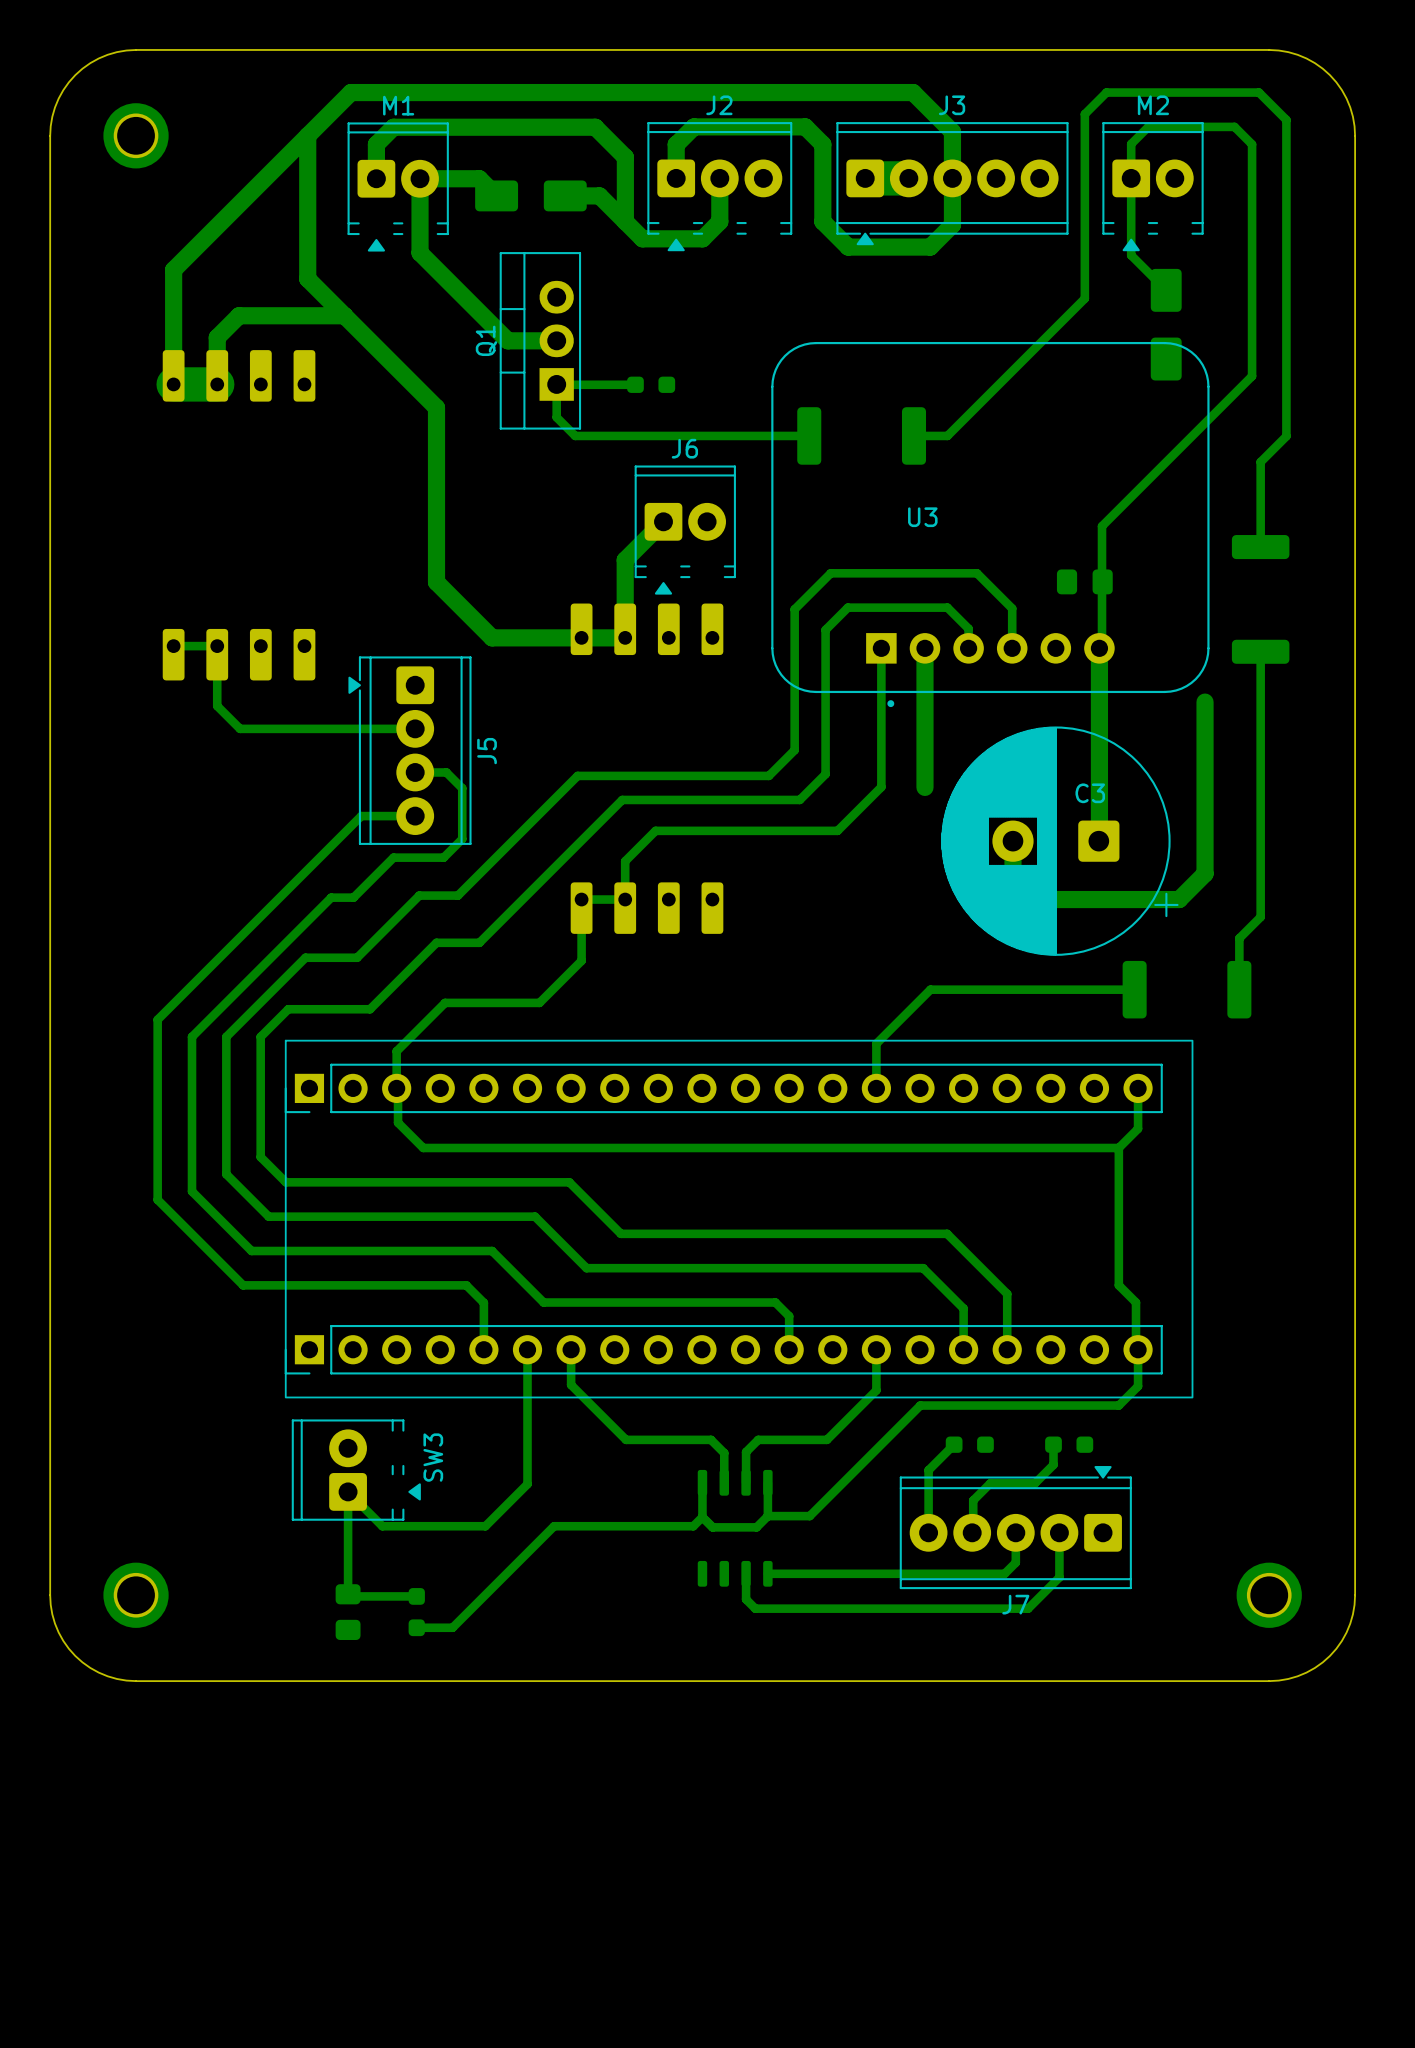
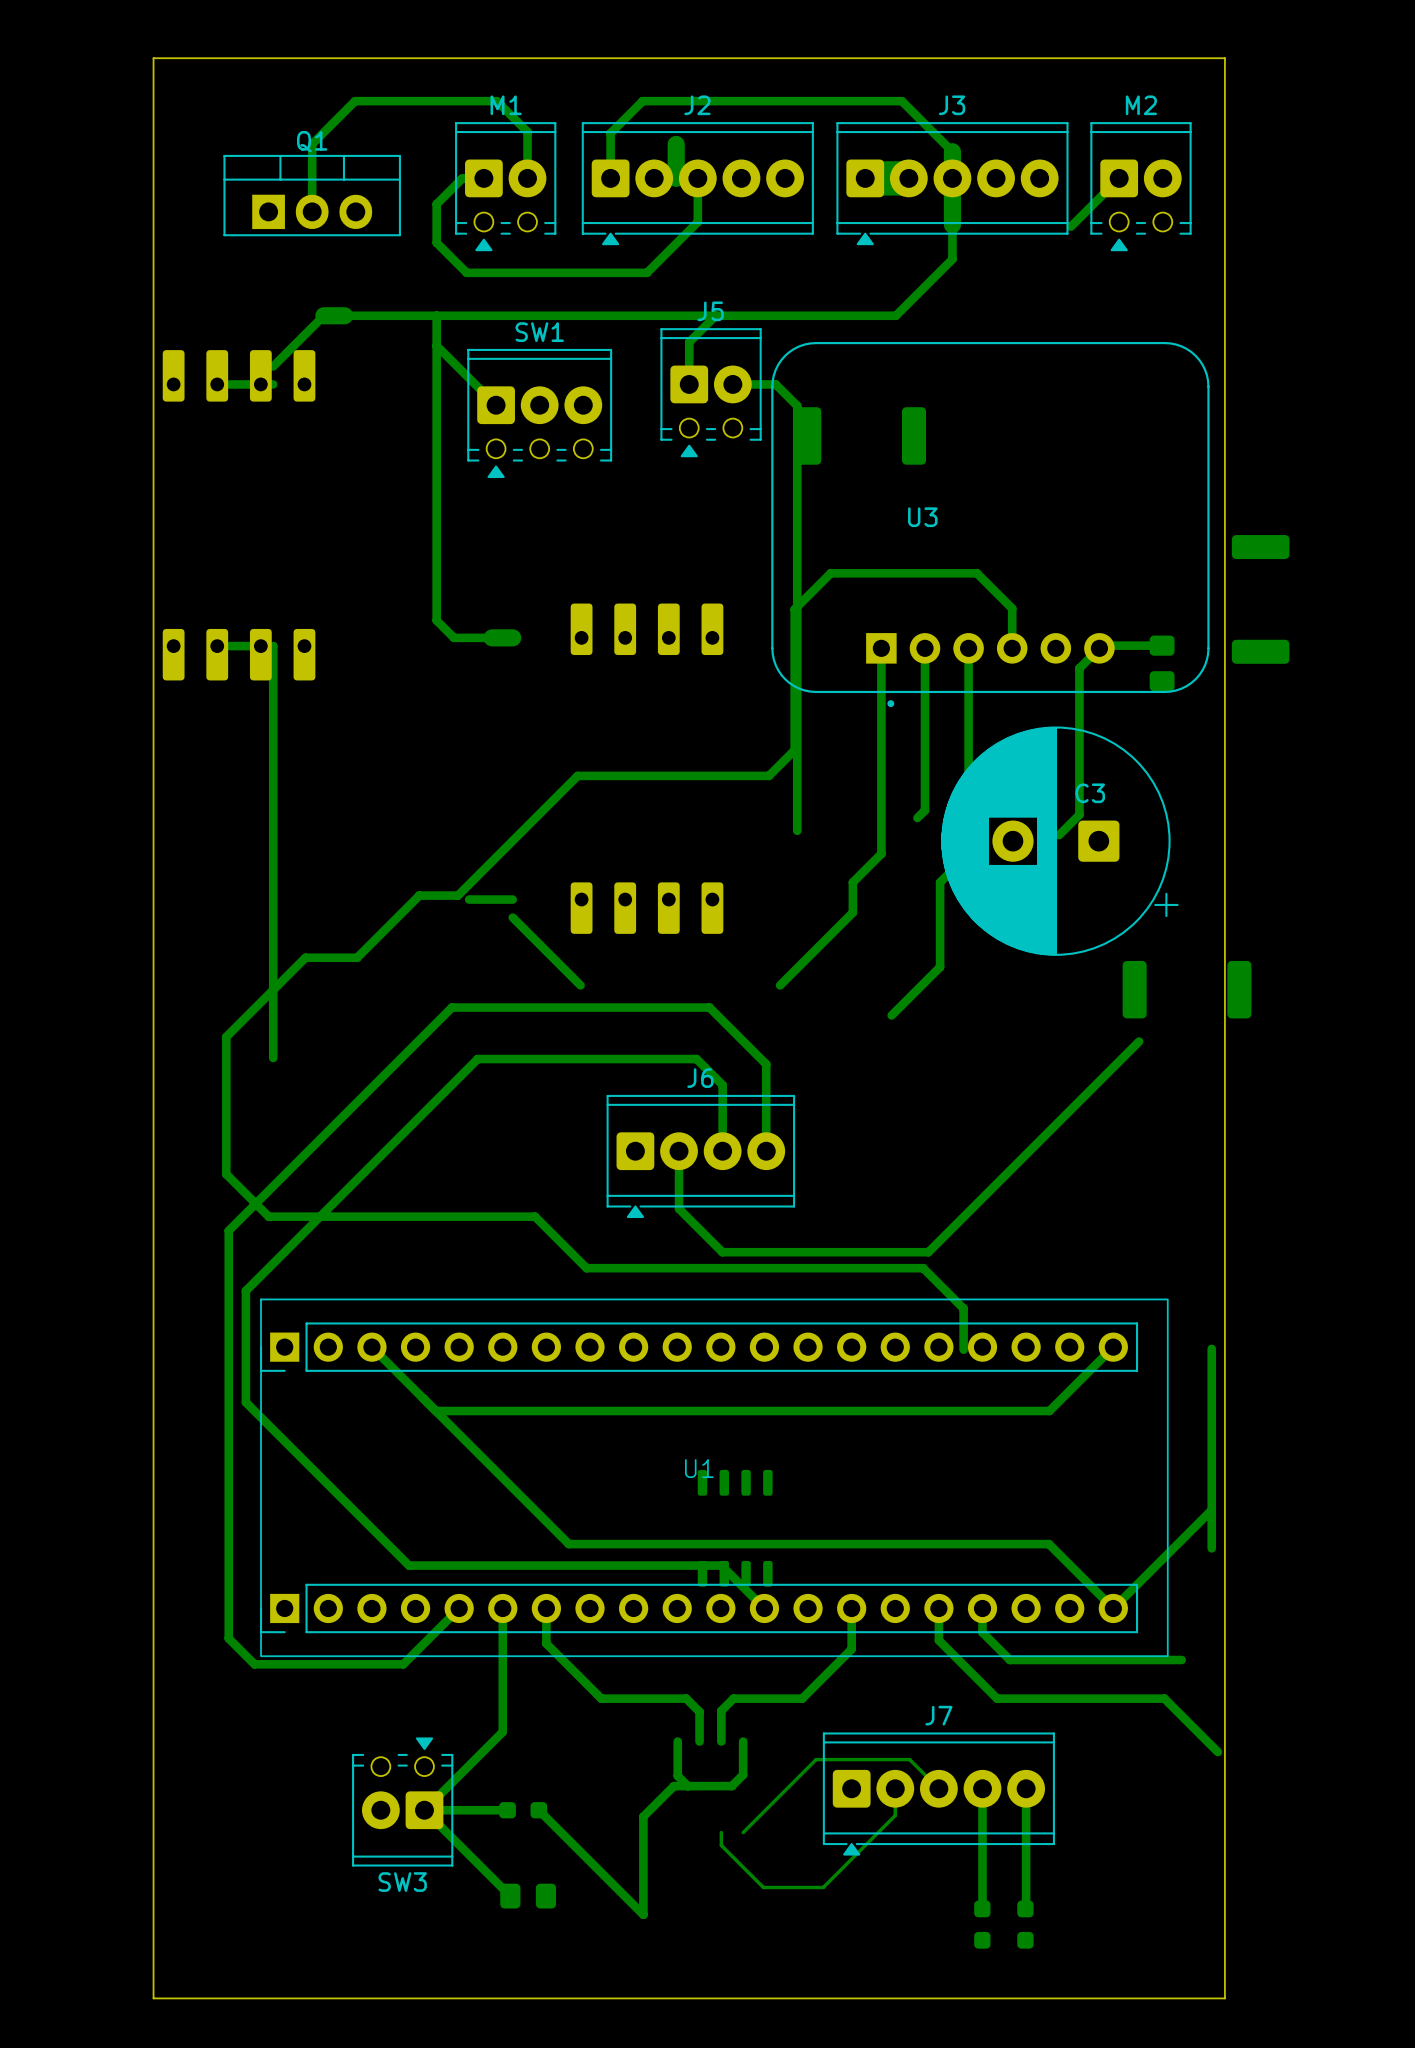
board edge: (136, 49) (1269, 49) (1288, 52) (1306, 58) (1322, 68) (1336, 82) (1350, 107) (1355, 135) (1355, 1595) (1352, 1614) (1346, 1632) (1336, 1648) (1322, 1662) (1297, 1676) (1269, 1681) (136, 1681) (116, 1678) (98, 1672) (82, 1662) (68, 1648) (55, 1623) (50, 1595) (50, 135) (55, 107) (63, 90) (75, 75) (90, 63) (107, 54) (136, 49) -> (153, 58) (153, 1998) (1224, 1998) (1224, 58) (153, 58)
M1 footprint: [347, 122, 449, 252] -> [455, 122, 557, 252]
J2 footprint: [647, 122, 793, 252] -> [581, 122, 814, 246]
M2 footprint: [1102, 122, 1204, 252] -> [1090, 122, 1192, 252]
part: (136, 135) -> none
bottom track: (307, 135) (307, 278) (436, 407) (436, 582) (492, 637) -> (436, 315) (436, 620) (454, 637) (492, 637)
bottom track: (676, 144) (694, 126) (805, 126) (822, 144) (822, 221) (848, 247) (930, 247) (952, 224) -> (344, 315) (895, 315) (952, 259) (952, 224)
bottom track: (952, 151) (952, 131) (913, 92) (351, 92) (173, 269) (173, 384) (217, 384) (217, 337) (239, 315) (323, 315) -> (952, 151) (901, 101) (642, 101) (610, 133) (610, 178)
bottom track: (376, 178) (376, 144) (393, 127) (595, 127) (625, 157) (625, 221) -> none
bottom track: none -> (483, 178) (462, 178) (436, 204) (436, 242) (466, 272) (647, 272) (697, 222) (697, 178) (654, 178)
bottom track: none -> (527, 178) (527, 131) (496, 101) (355, 101) (312, 144) (312, 211)
bottom track: (719, 178) (719, 221) (702, 238) (642, 238) (599, 195) (565, 195) -> none
bottom track: none -> (1119, 178) (1070, 226)
bottom track: (496, 195) (479, 178) (420, 178) (420, 252) (507, 340) (556, 340) -> none
part: (530, 195) -> none
bottom track: (1166, 290) (1131, 255) (1131, 144) (1148, 126) (1234, 126) (1252, 144) (1252, 376) (1102, 526) (1102, 645) -> none
bottom track: none -> (323, 315) (273, 366)
bottom track: none -> (715, 315) (689, 342) (689, 384)
part: (1166, 324) -> none
Q1 rotation: 0° (540, 340) -> 90° clockwise (312, 195)
Q1 position: (540, 340) -> (312, 195)
bottom track: none -> (436, 345) (496, 405)
bottom track: (556, 384) (556, 417) (575, 435) (809, 435) -> none
bottom track: (557, 384) (635, 384) -> none
part: (651, 384) -> none
bottom track: none -> (732, 384) (775, 384) (797, 405) (797, 830)
SW1: none -> (539, 413)
bottom track: (914, 435) (947, 435) (1084, 298) (1084, 114) (1106, 92) (1259, 92) (1286, 119) (1286, 436) (1260, 462) (1260, 547) -> none
J6 footprint: [634, 465, 736, 595] -> [606, 1094, 796, 1219]
bottom track: (663, 521) (625, 560) (625, 637) (512, 637) -> none
part rotation: 0° (1084, 581) -> 90° clockwise (1162, 663)
part position: (1084, 581) -> (1162, 663)
bottom track: none -> (1162, 645) (1102, 645) (1079, 668) (1079, 814) (1059, 835)
bottom track: (173, 646) (217, 646) -> (229, 384) (273, 384)
bottom track: none -> (229, 646) (273, 646) (273, 1058)
bottom track width: thick (924, 648) (924, 787) -> thin (924, 648) (924, 787)
bottom track: (968, 648) (968, 628) (947, 607) (847, 607) (825, 629) (825, 774) (799, 799) (622, 799) (479, 942) (436, 942) (370, 1009) (288, 1009) (260, 1036) (260, 1157) (285, 1182) (569, 1182) (620, 1233) (947, 1233) (1007, 1293) (1007, 1349) -> (968, 648) (968, 853) (940, 882) (940, 967) (891, 1015)
bottom track: (1099, 648) (1099, 840) -> none
bottom track: (1260, 651) (1260, 917) (1239, 938) (1239, 989) -> none
J5 footprint: [348, 656, 472, 845] -> [660, 328, 762, 458]
bottom track: (217, 671) (217, 706) (240, 728) (415, 728) -> none
bottom track: (1205, 702) (1205, 873) (1179, 899) (1037, 899) (1012, 874) (1012, 841) -> none
J5 name position: J5 (487, 751) -> J5 (710, 311)
bottom track: (415, 772) (446, 772) (462, 788) (462, 839) (443, 857) (393, 857) (353, 897) (331, 897) (192, 1036) (192, 1191) (251, 1251) (492, 1251) (543, 1302) (775, 1302) (789, 1316) (789, 1349) -> none
bottom track: (881, 787) (837, 830) (655, 830) (625, 861) (625, 899) (581, 899) (581, 960) (539, 1002) (445, 1002) (396, 1051) (396, 1088) -> (881, 787) (881, 853) (852, 882) (852, 912) (780, 985)
bottom track: none -> (924, 787) (924, 810) (917, 817)
bottom track: (415, 816) (361, 816) (157, 1019) (157, 1199) (243, 1285) (466, 1285) (483, 1302) (483, 1349) -> none
bottom track: none -> (469, 899) (512, 899)
bottom track: none -> (512, 917) (580, 985)
bottom track: (1134, 989) (930, 989) (876, 1043) (876, 1088) -> none
bottom track: none -> (1139, 1041) (928, 1252) (722, 1252) (679, 1208) (679, 1151)
bottom track: (1138, 1088) (1138, 1128) (1118, 1147) -> none
bottom track: (398, 1089) (398, 1122) (423, 1147) (1118, 1147) -> none
bottom track: (1118, 1147) (1118, 1285) (1136, 1302) (1136, 1347) -> none
bottom track: none -> (722, 1151) (722, 1085) (696, 1059) (477, 1059) (245, 1290) (245, 1402) (409, 1565) (721, 1565) (764, 1608)
bottom track: none -> (766, 1151) (766, 1064) (709, 1007) (451, 1007) (228, 1230) (228, 1638) (254, 1664) (403, 1664) (459, 1608)
part: (739, 1219) -> none
bottom track: none -> (371, 1347) (568, 1544) (1048, 1544) (1113, 1608) (1211, 1510)
bottom track: none -> (1113, 1347) (1049, 1411) (435, 1411)
bottom track: none -> (1211, 1348) (1211, 1548)
bottom track: (527, 1349) (527, 1484) (485, 1526) (382, 1526) (348, 1491) (348, 1594) -> none
bottom track: (571, 1349) (571, 1384) (626, 1439) (711, 1439) (724, 1453) (724, 1482) -> (546, 1608) (546, 1643) (601, 1698) (686, 1698) (699, 1711) (699, 1741)
bottom track: (876, 1349) (876, 1390) (826, 1439) (758, 1439) (746, 1452) (746, 1482) -> (851, 1608) (851, 1649) (802, 1698) (733, 1698) (721, 1710) (721, 1741)
bottom track: (1138, 1349) (1138, 1386) (1118, 1405) (920, 1405) (809, 1516) (767, 1516) -> none
SW3 footprint: [291, 1419, 421, 1521] -> [352, 1737, 454, 1867]
bottom track: (954, 1444) (928, 1470) (928, 1532) -> none
part: (969, 1444) -> none
bottom track: (1053, 1444) (1053, 1464) (1035, 1483) (990, 1483) (973, 1500) (973, 1531) -> none
part: (1069, 1444) -> none
SW3 name position: SW3 (433, 1457) -> SW3 (402, 1882)
U1: none -> (714, 1477)
bottom track: (702, 1482) (702, 1517) -> none
bottom track: (767, 1482) (767, 1516) -> none
bottom track: (767, 1516) (756, 1527) (712, 1527) (702, 1517) -> none
bottom track: (702, 1517) (693, 1526) (554, 1526) (452, 1627) (416, 1627) -> none
J7 rotation: 0° (1015, 1527) -> 180° (938, 1794)
J7 position: (1015, 1527) -> (938, 1794)
bottom track: (1015, 1532) (1015, 1562) (1004, 1573) (767, 1573) -> none
bottom track: (1059, 1532) (1059, 1577) (1028, 1608) (755, 1608) (746, 1599) (746, 1573) -> none
part: (136, 1595) -> none
part: (1269, 1595) -> none
bottom track: (350, 1596) (416, 1596) -> none
bottom track: none -> (502, 1608) (502, 1731) (424, 1810)
bottom track: none -> (938, 1608) (938, 1640) (997, 1698) (1164, 1698) (1217, 1752)
bottom track: none -> (982, 1608) (982, 1632) (1009, 1659) (1181, 1659)
part rotation: 0° (348, 1612) -> 90° clockwise (528, 1896)
part position: (348, 1612) -> (528, 1896)
part rotation: 0° (416, 1612) -> 90° clockwise (523, 1810)
part position: (416, 1612) -> (523, 1810)
bottom track: none -> (677, 1741) (677, 1775) (687, 1786)
bottom track: none -> (743, 1741) (743, 1774) (731, 1786) (673, 1786) (643, 1816) (643, 1914) (538, 1810)
bottom track: none -> (895, 1788) (895, 1815) (823, 1887) (763, 1887) (721, 1845) (721, 1832)
bottom track: none -> (938, 1788) (909, 1759) (816, 1759) (743, 1832)
bottom track: none -> (982, 1788) (982, 1908)
bottom track: none -> (1026, 1788) (1026, 1908)
bottom track: none -> (424, 1810) (506, 1810)
bottom track: none -> (424, 1810) (510, 1896)
part: none -> (982, 1924)
part: none -> (1025, 1924)

